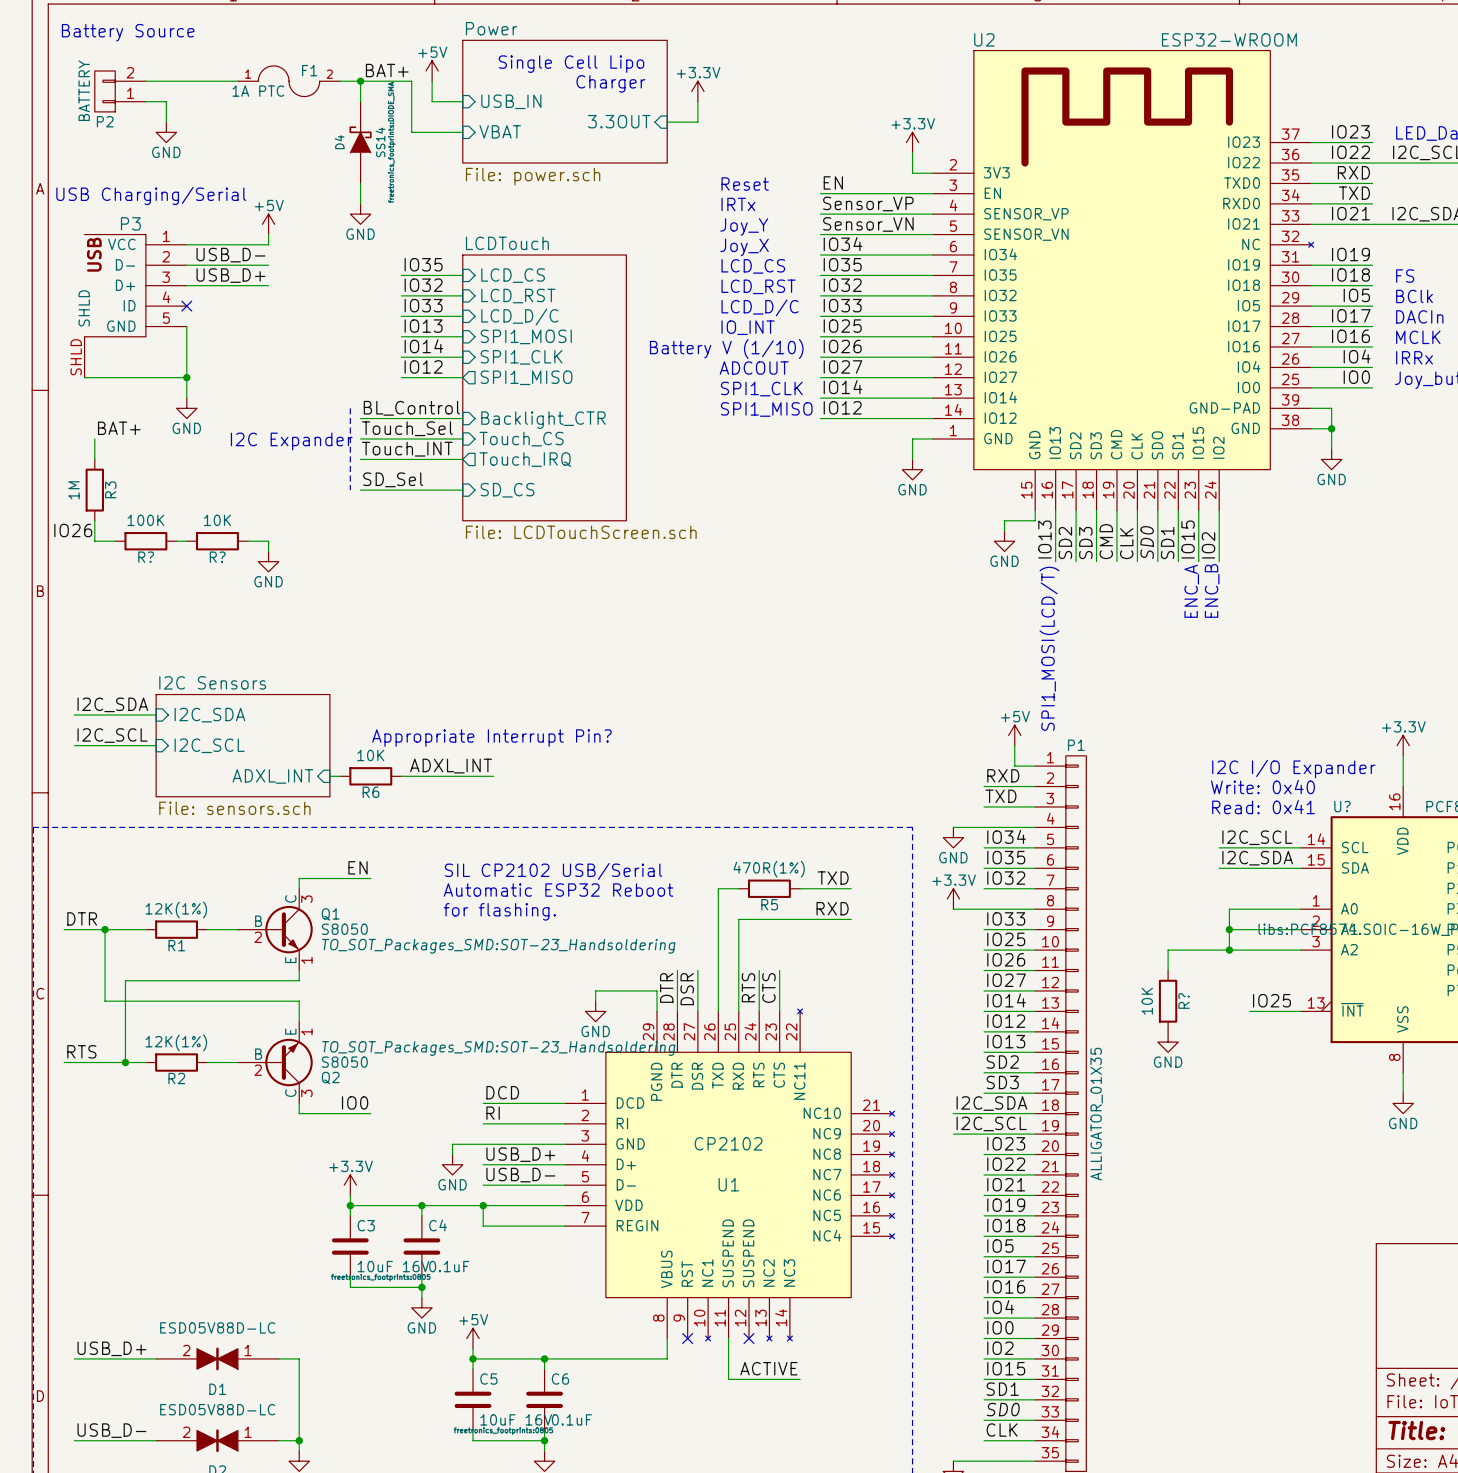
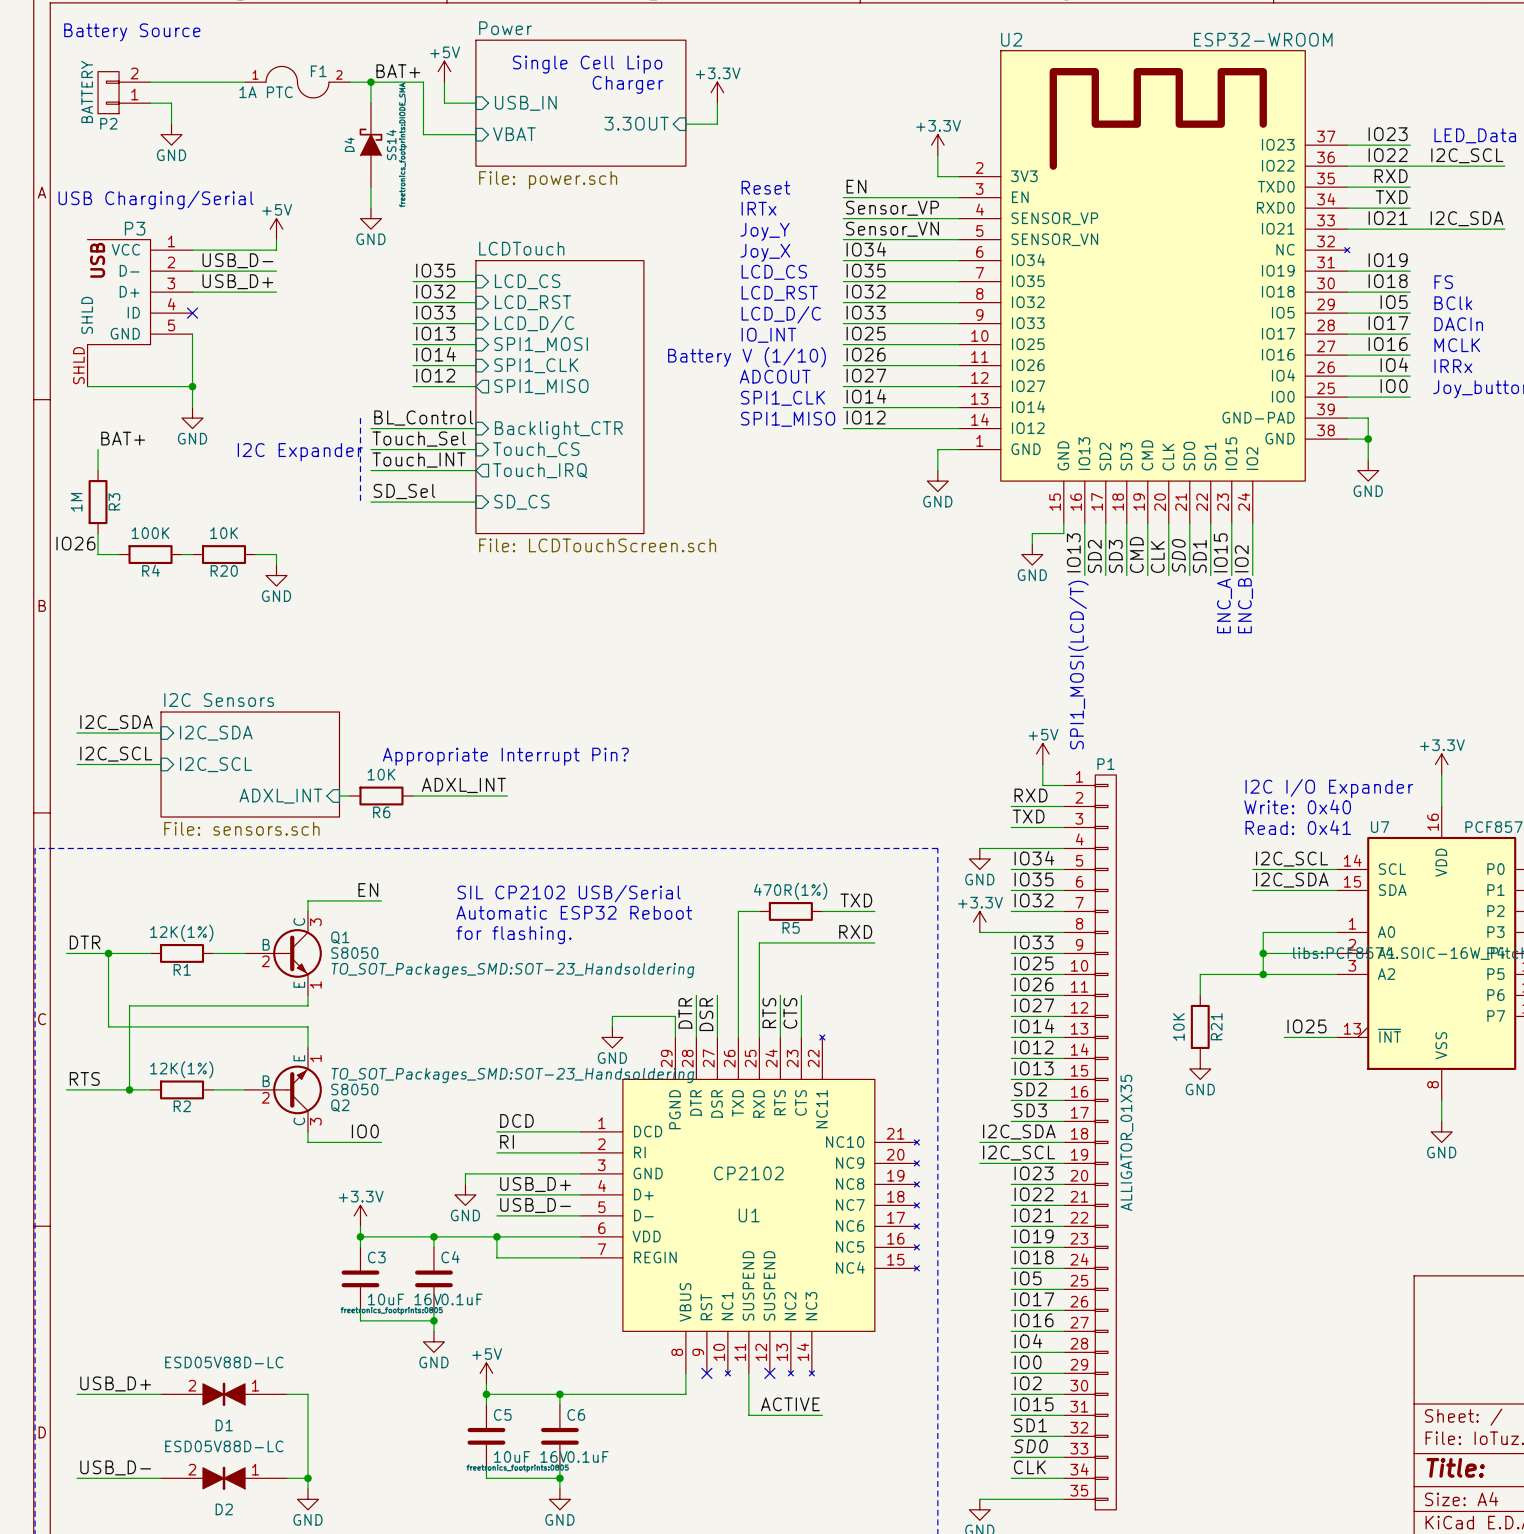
R? name: R? (146, 557) -> R4 (151, 570)
R? name: R? (217, 557) -> R20 (224, 570)
U? name: U? (1342, 806) -> U7 (1380, 827)
R? name: R? (1184, 1000) -> R21 (1216, 1026)

